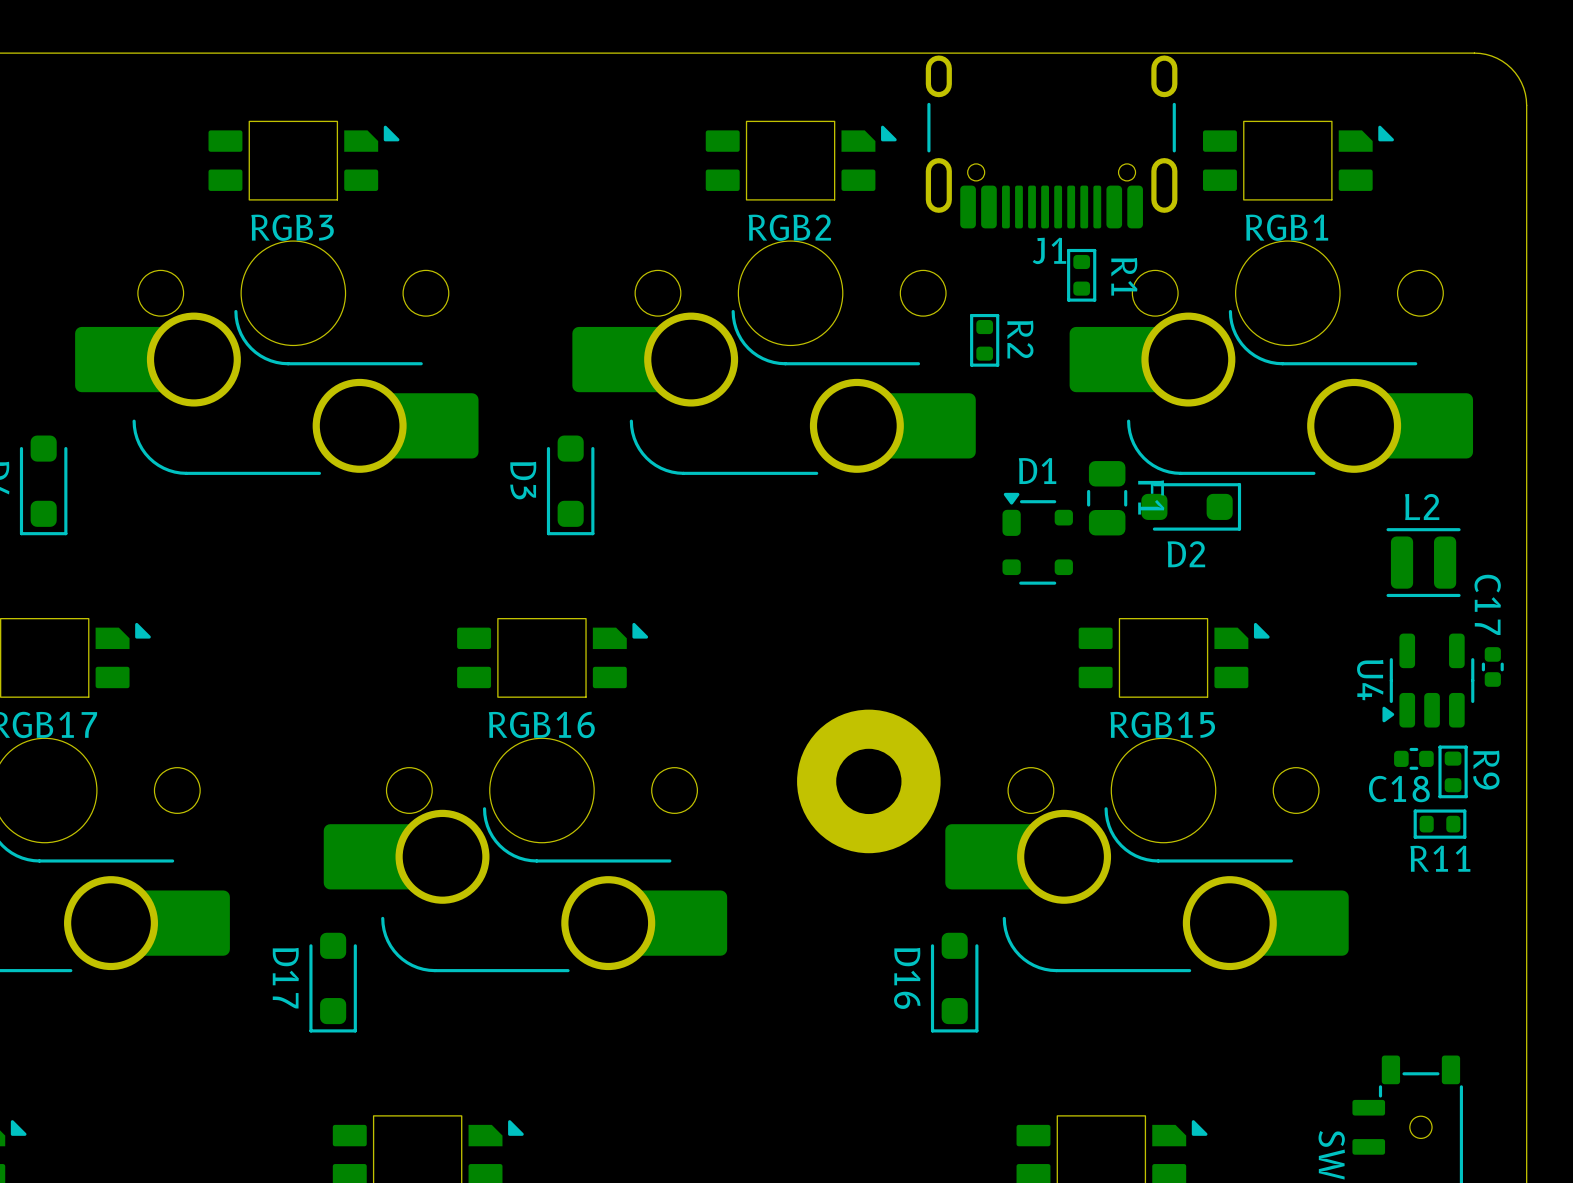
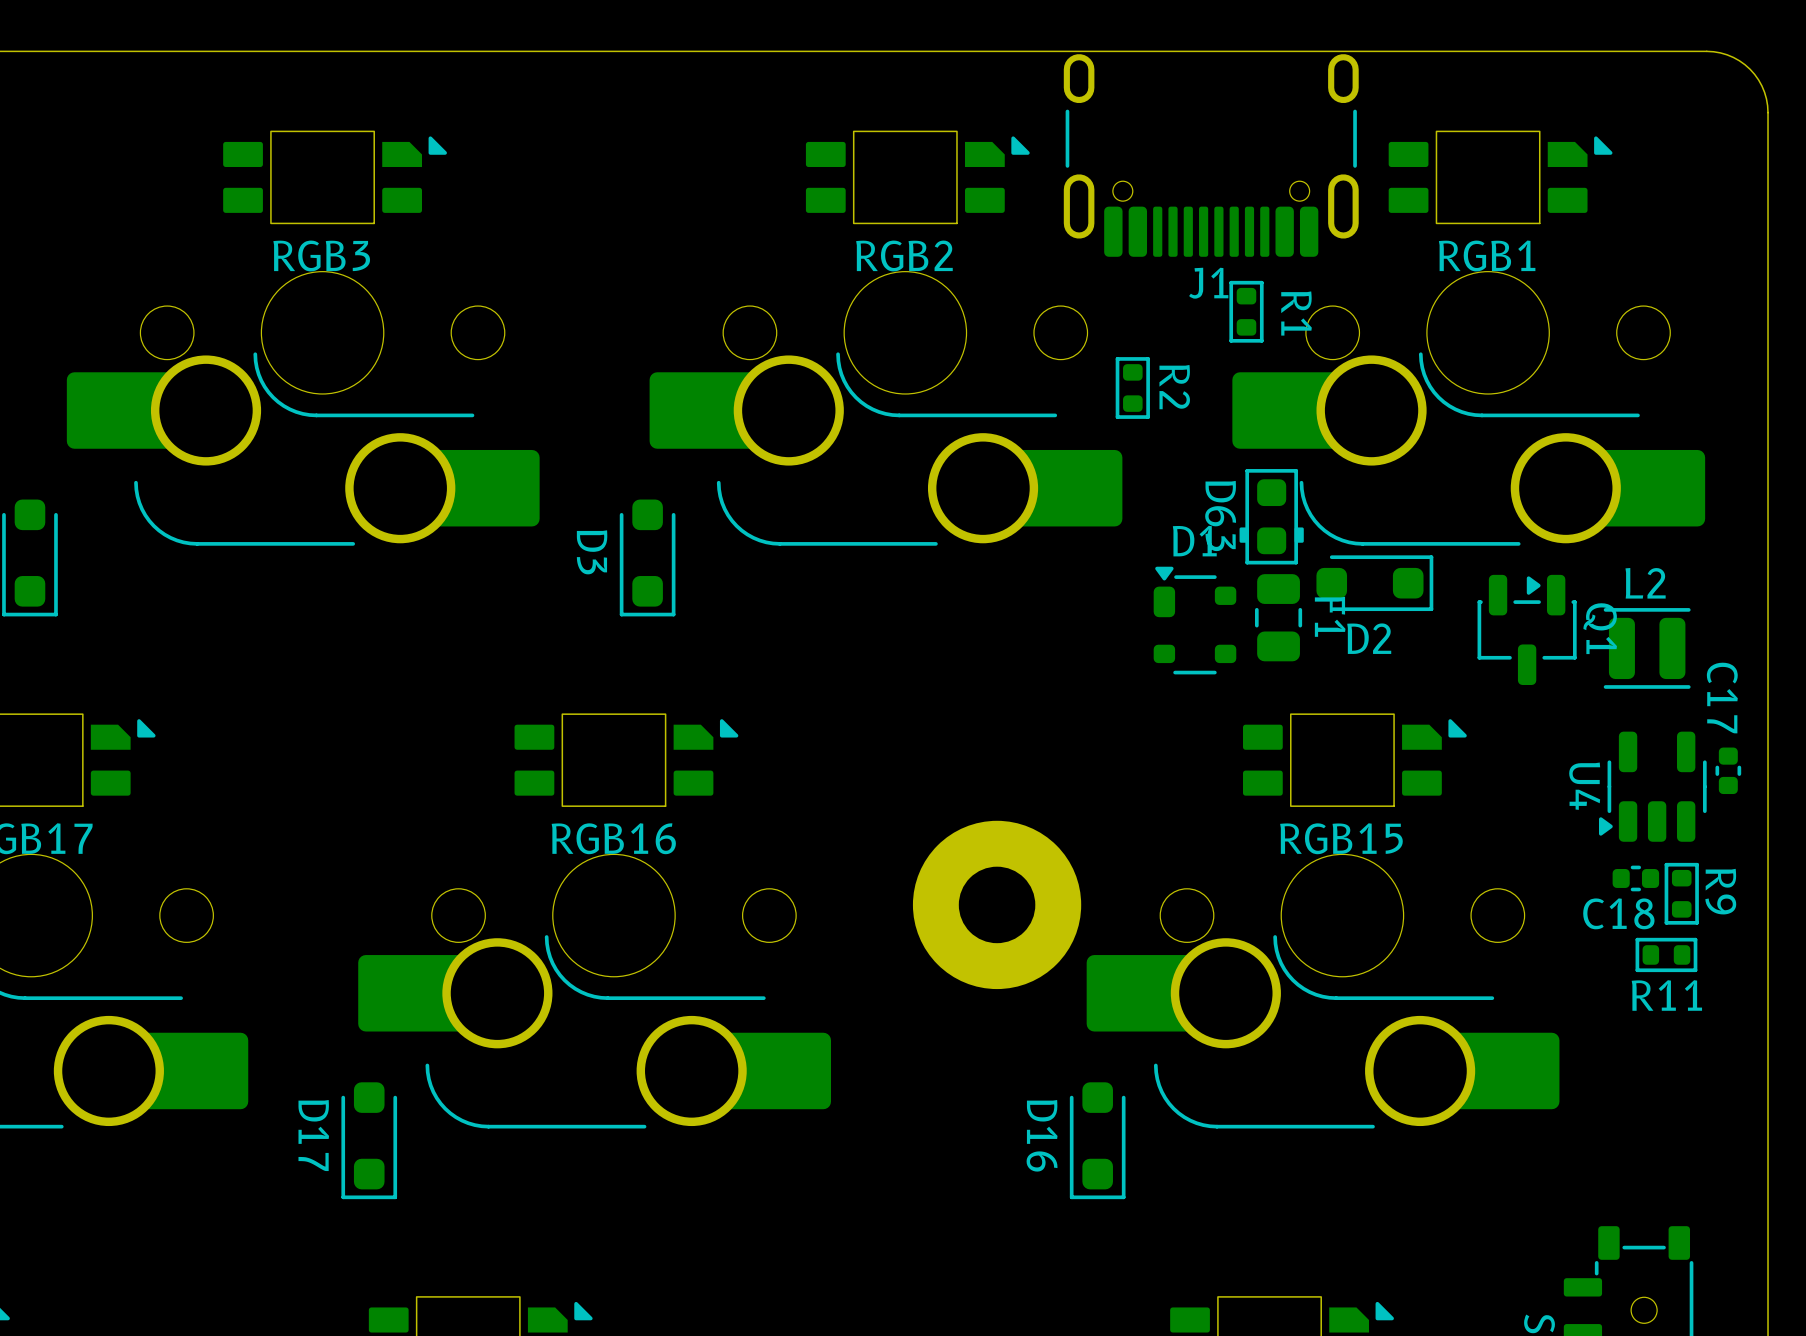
D63: none -> (1271, 516)
F1 position: (1107, 498) -> (1278, 617)
Q1: none -> (1527, 629)

